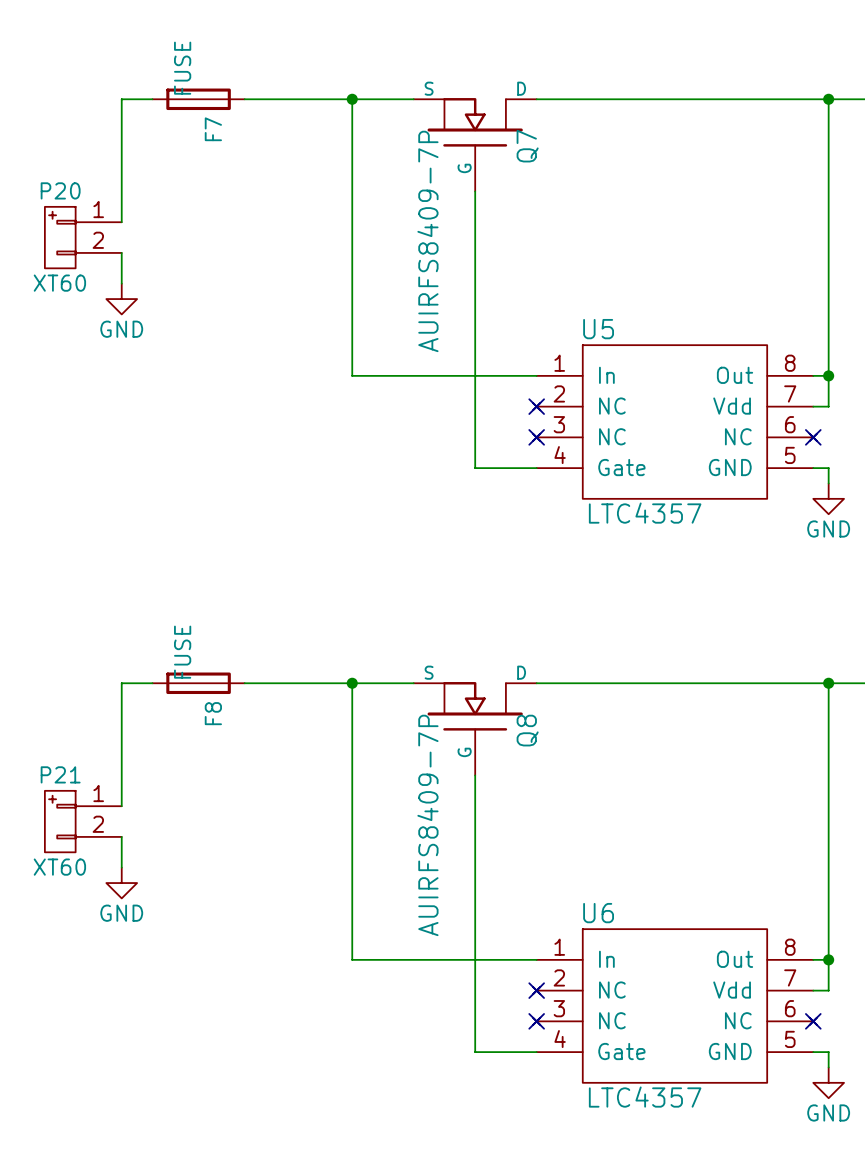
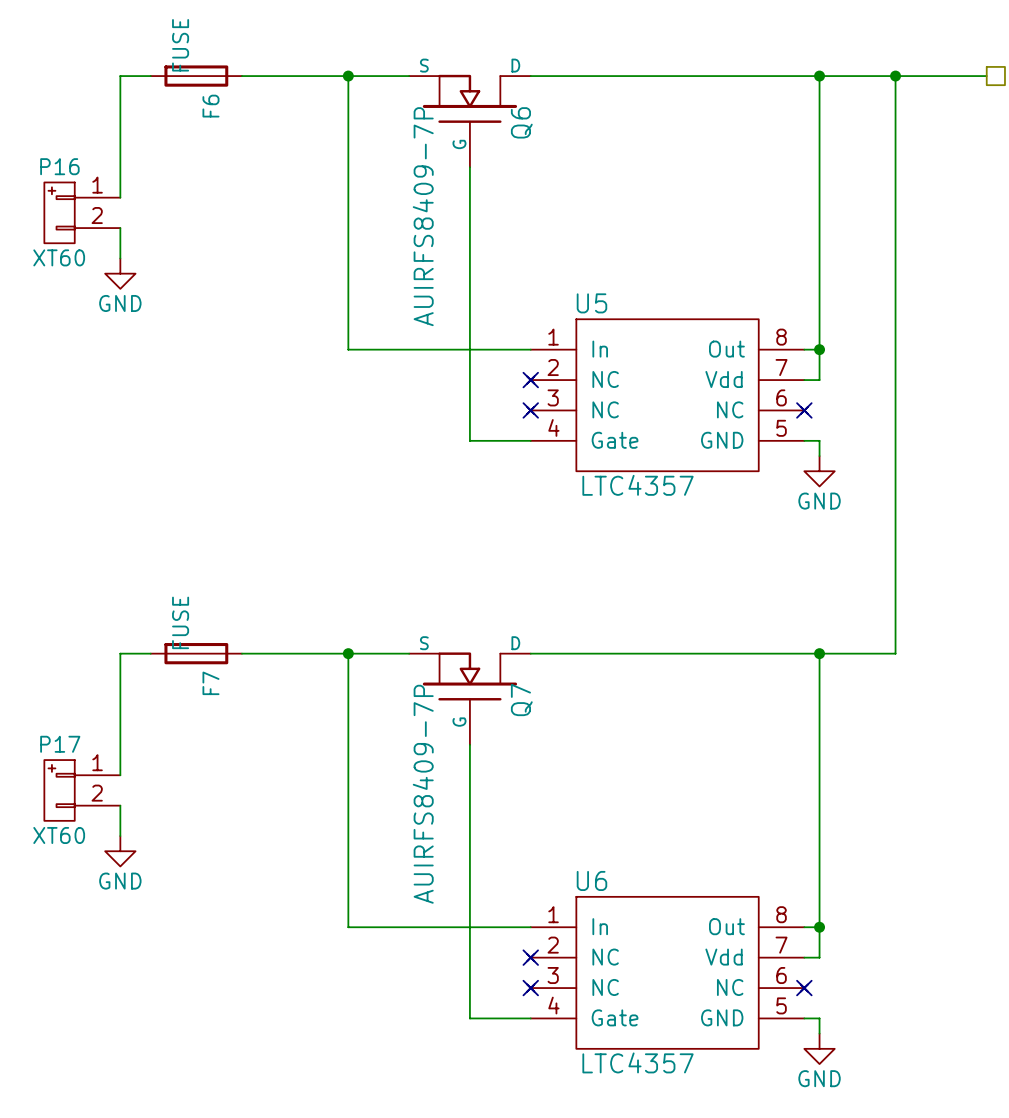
F7 name: F7 (213, 129) -> F6 (210, 106)
Q7 name: Q7 (527, 146) -> Q6 (521, 122)
P20 name: P20 (60, 190) -> P16 (59, 166)
F8 name: F8 (213, 713) -> F7 (210, 683)
Q8 name: Q8 (527, 730) -> Q7 (521, 700)
P21 name: P21 (60, 774) -> P17 (60, 744)

